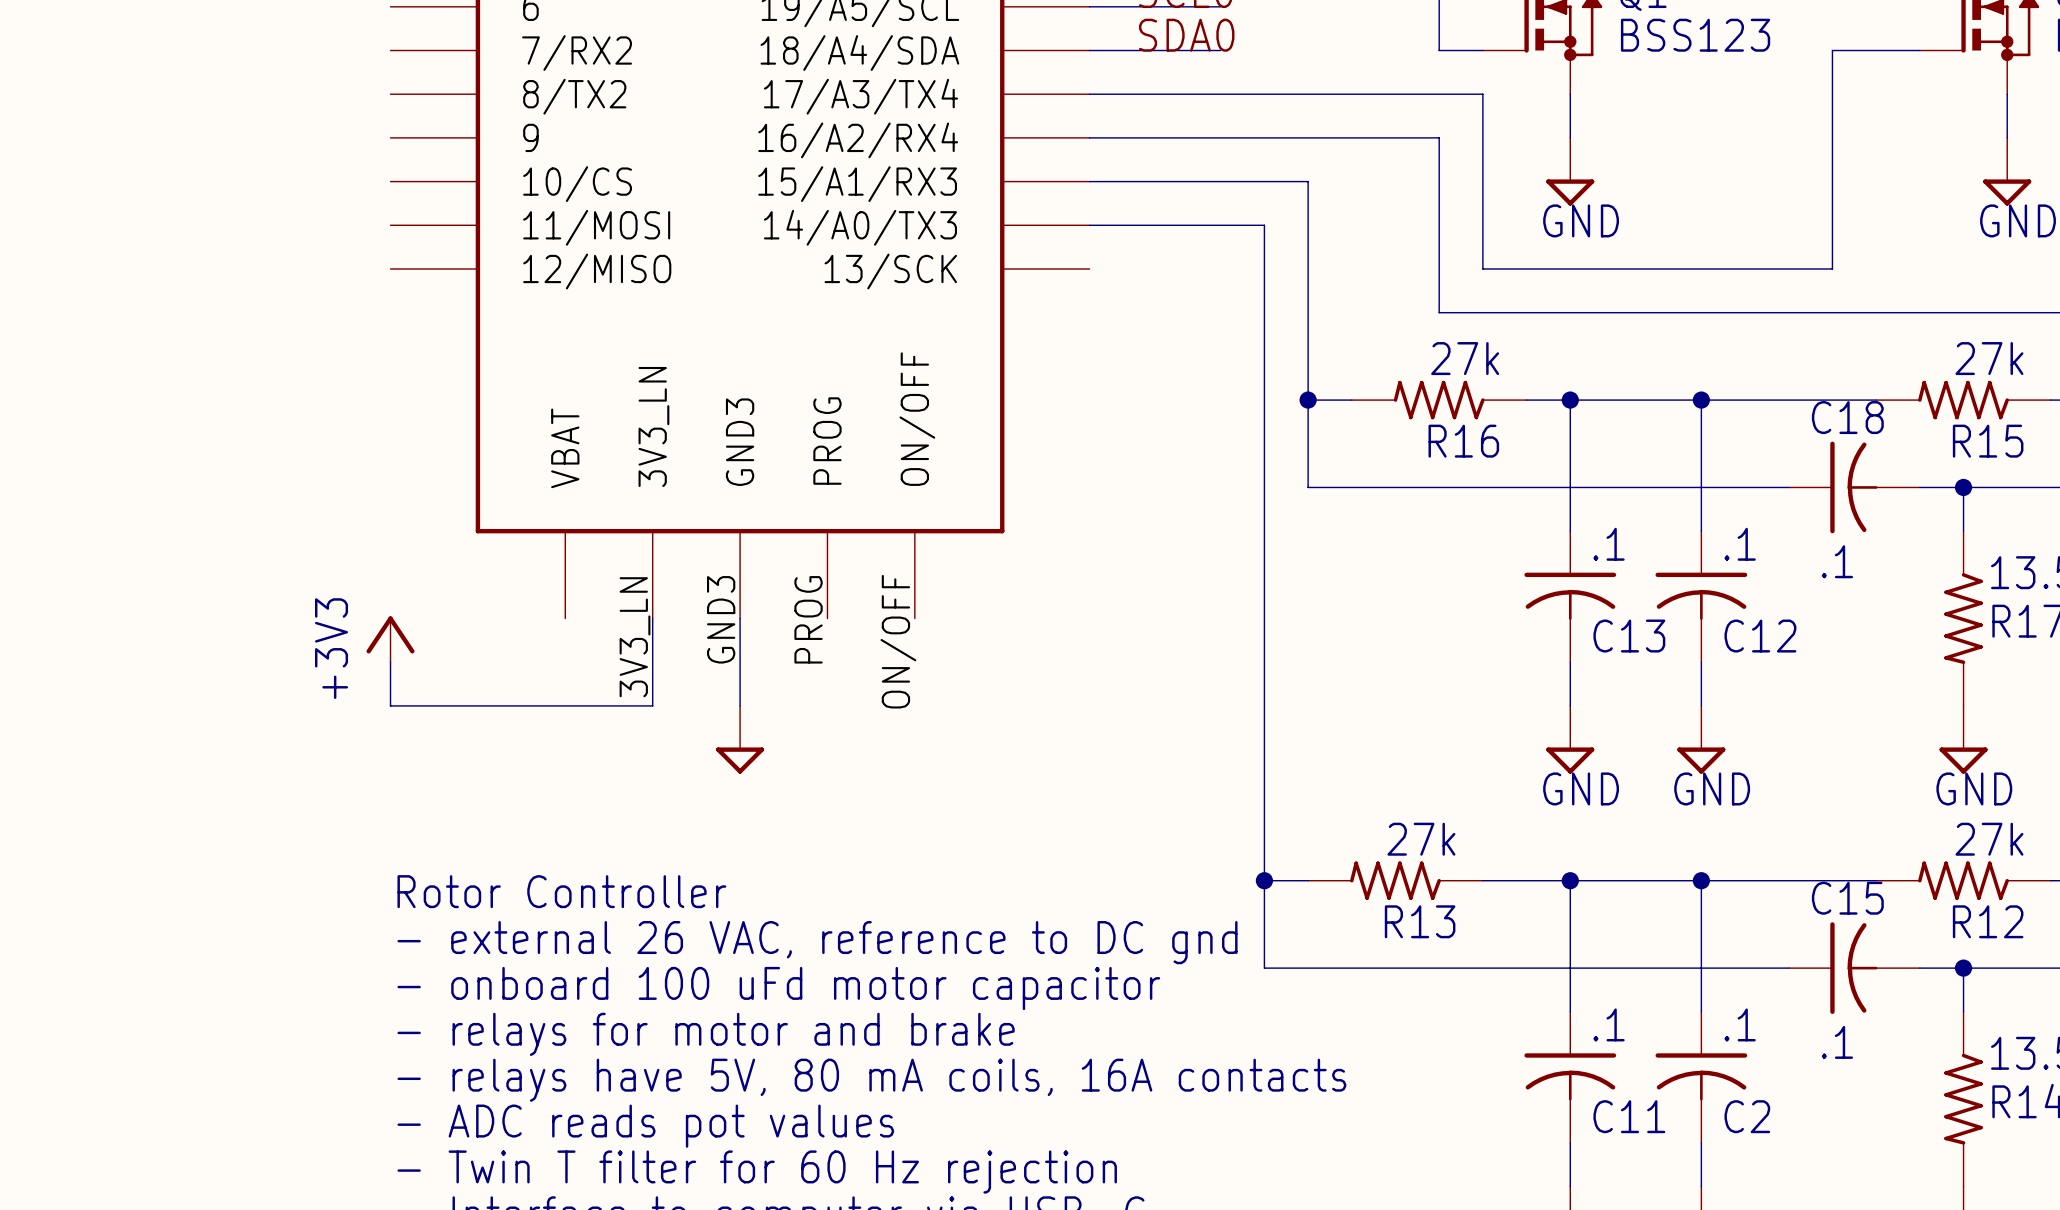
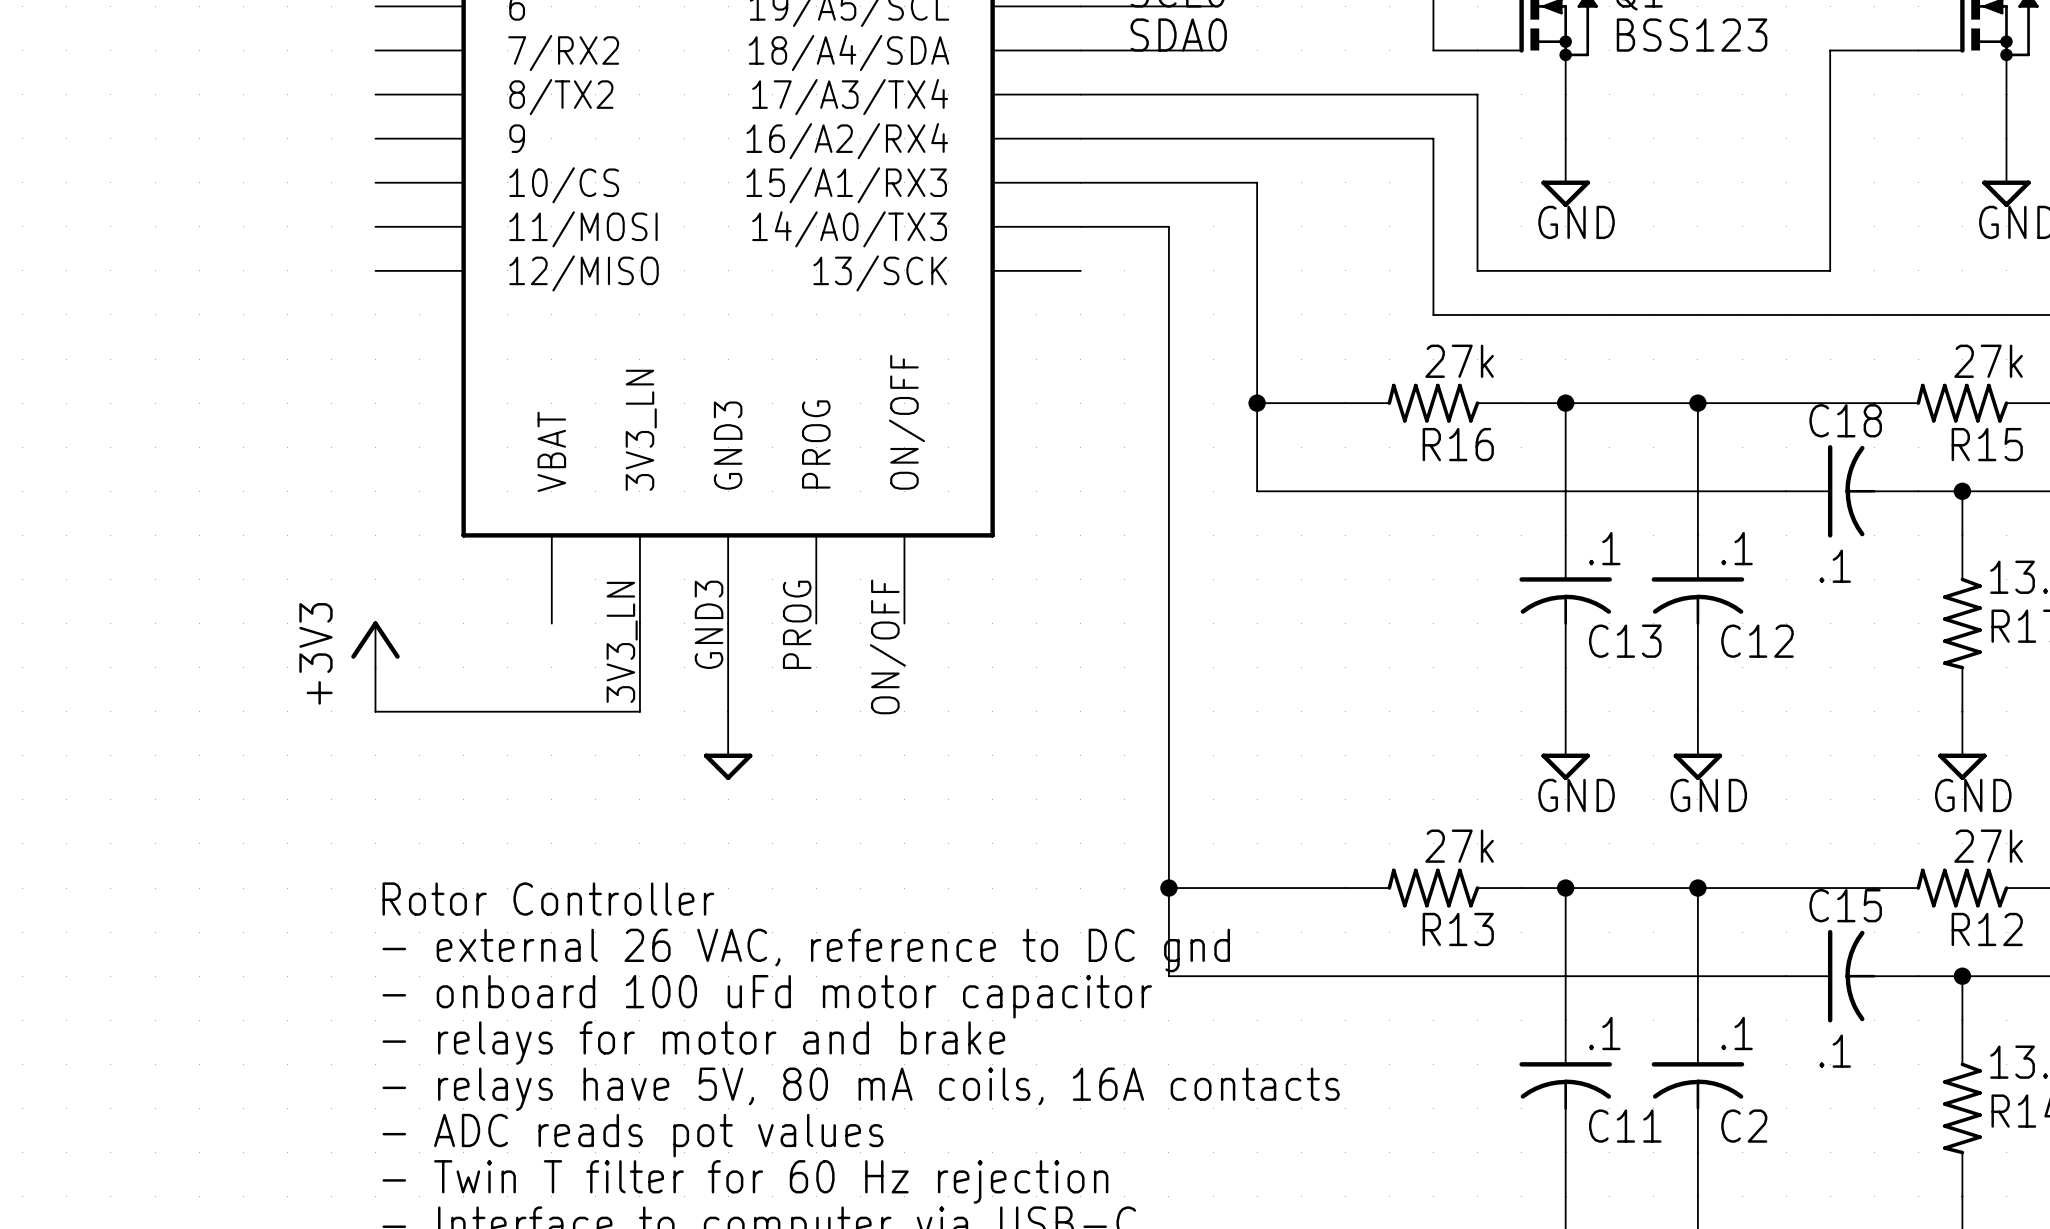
wire: (1264, 181) (1308, 181) (1308, 487) -> (1257, 491) (1301, 491)
wire: (1177, 225) (1264, 225) -> (1257, 182) (1257, 226)
wire: none -> (1257, 403) (1301, 403)
junction position: (1308, 400) -> (1257, 403)
wire: (1264, 487) (1264, 968) -> (1168, 226) (1168, 976) (1257, 976)
wire: none -> (1168, 888) (1257, 888)
junction position: (1264, 880) -> (1168, 888)
R13 position: (1395, 880) -> (1433, 888)

